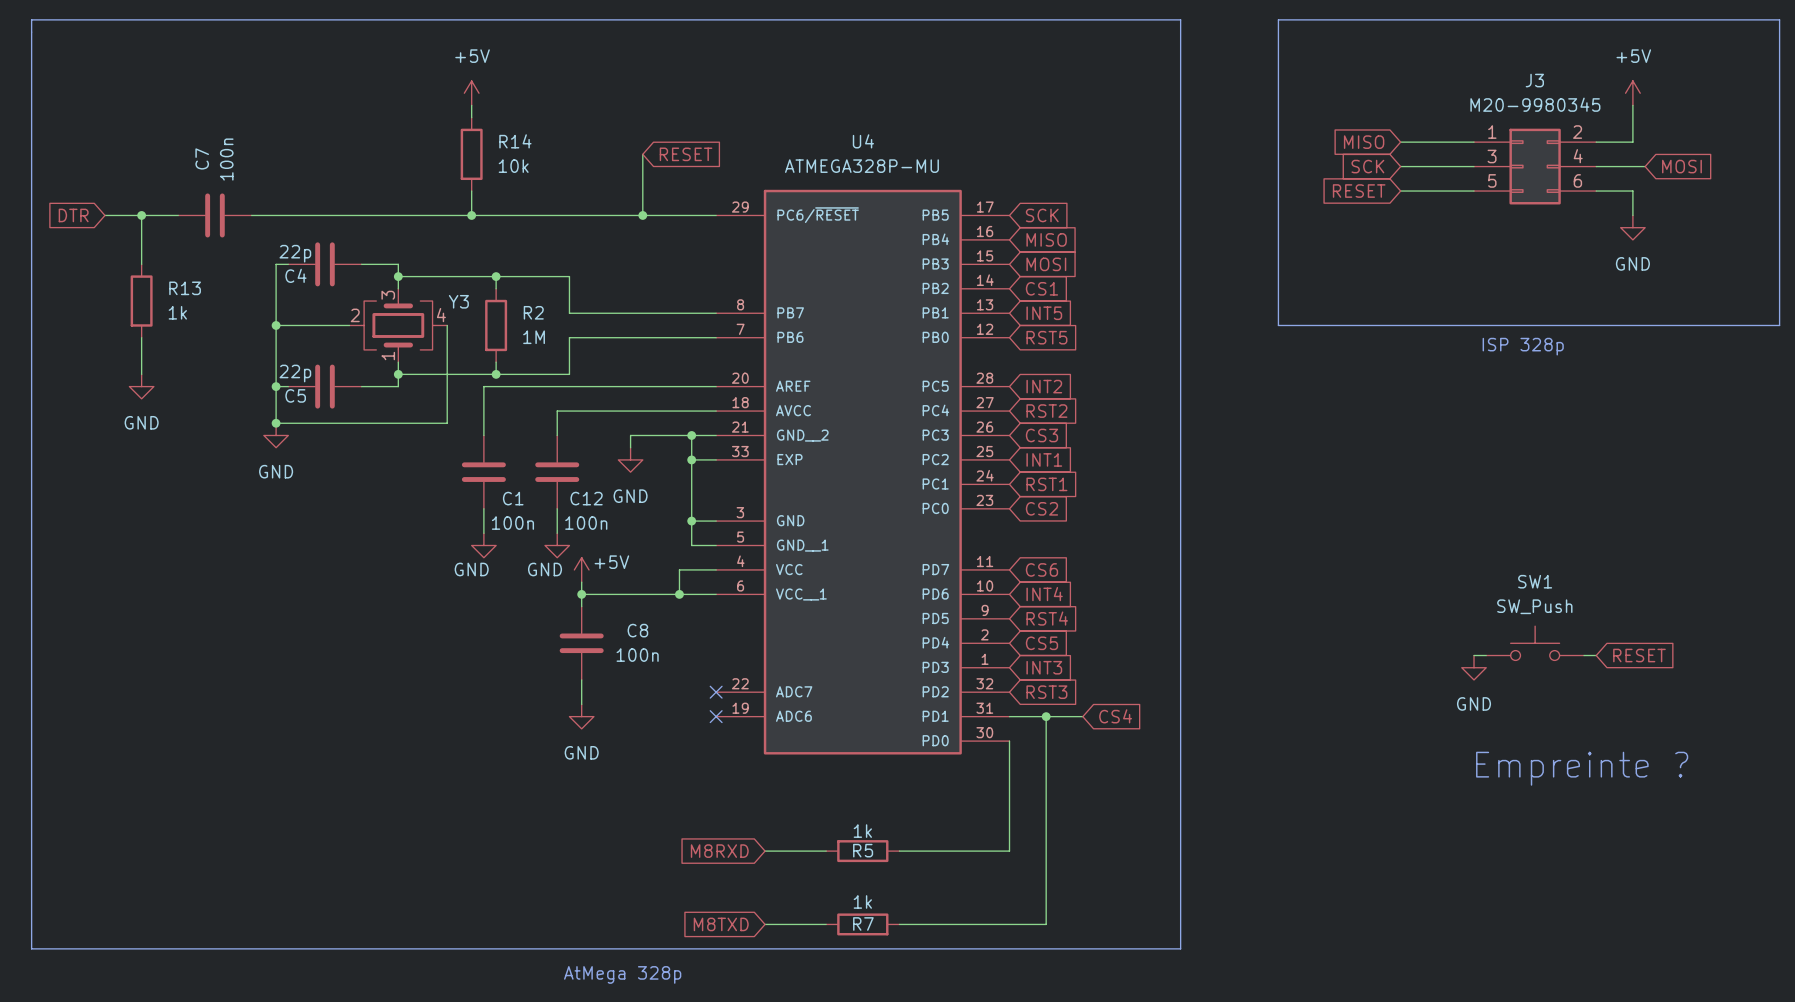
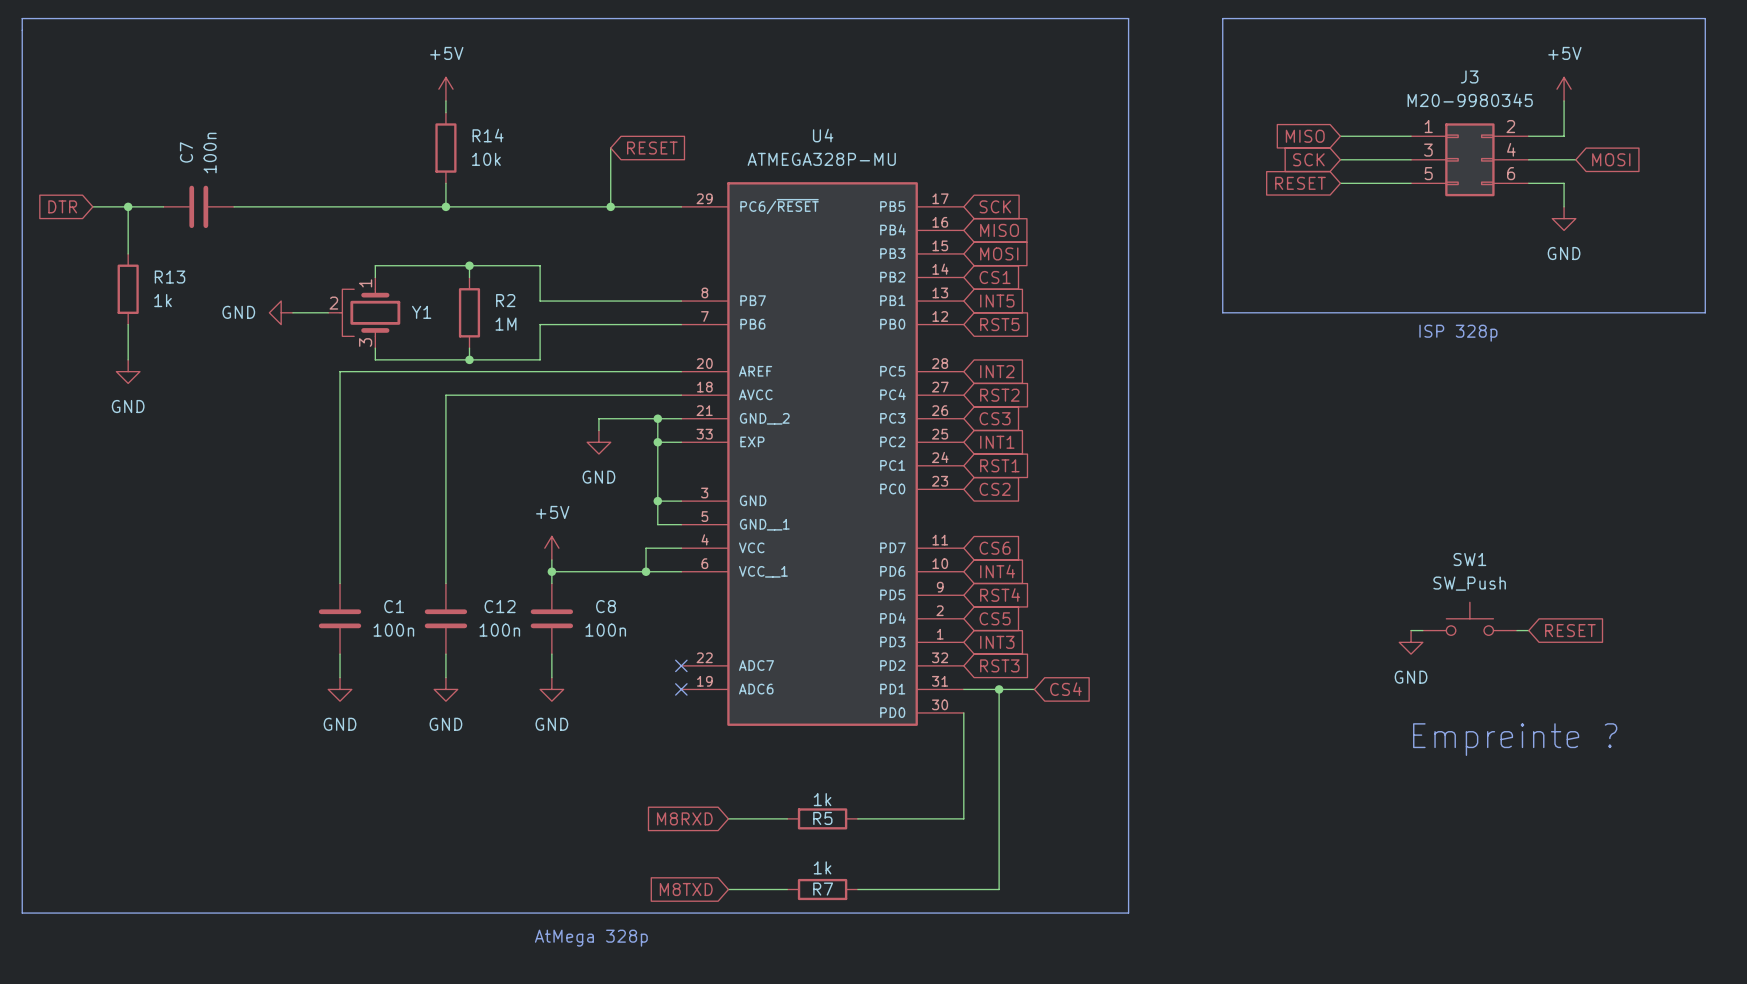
wire: (288, 264) (276, 264) (276, 423) (447, 423) (447, 325) -> none
C4: 22p (324, 264) -> none
wire: (361, 264) (398, 264) (398, 276) -> none
junction: (398, 276) -> none
wire: (276, 325) (312, 325) -> none
junction: (276, 325) -> none
Y1: none -> (364, 312)
Y3: (398, 325) -> none
wire: (398, 374) (398, 386) -> (457, 371) (375, 371)
junction: (398, 374) -> none
wire: (276, 386) (288, 386) -> none
junction: (276, 386) -> none
C5: 22p (324, 386) -> none
wire: none -> (340, 371) (340, 583)
wire: (483, 386) (483, 435) -> none
wire: (557, 411) (557, 435) -> (528, 395) (445, 395) (445, 583)
junction: (276, 423) -> none
power symbol rotation: 0° (276, 435) -> 90° clockwise (281, 312)
power symbol position: GND (276, 435) -> GND (281, 312)
C1 position: (483, 472) -> (340, 618)
C12 position: (557, 472) -> (445, 618)
C1 name position: C1 (513, 498) -> C1 (394, 606)
C12 name position: C12 (586, 498) -> C12 (500, 606)
wire: (483, 508) (483, 533) -> (445, 654) (445, 677)
wire: (557, 508) (557, 533) -> none
C1 value position: 100n (512, 523) -> 100n (393, 630)
C12 value position: 100n (586, 523) -> 100n (499, 630)
power symbol: GND (483, 545) -> none
power symbol: GND (557, 545) -> none
power symbol text position: +5V (611, 562) -> +5V (552, 512)
wire: none -> (340, 654) (340, 677)
power symbol: none -> GND (340, 689)
power symbol: none -> GND (445, 689)

